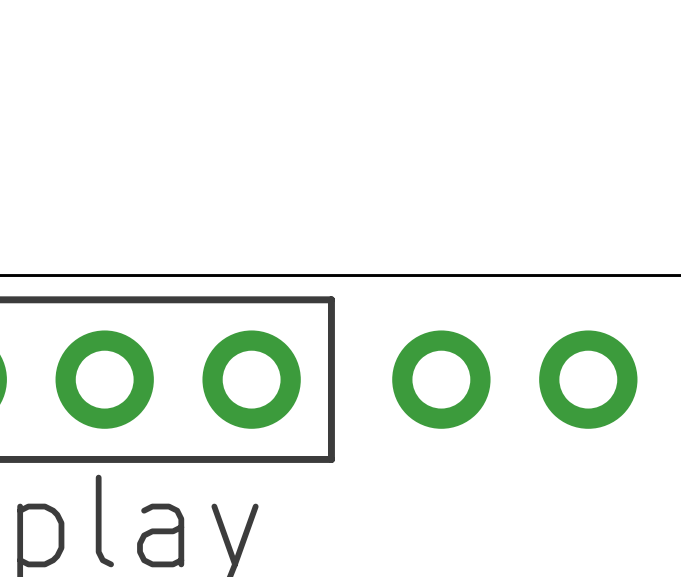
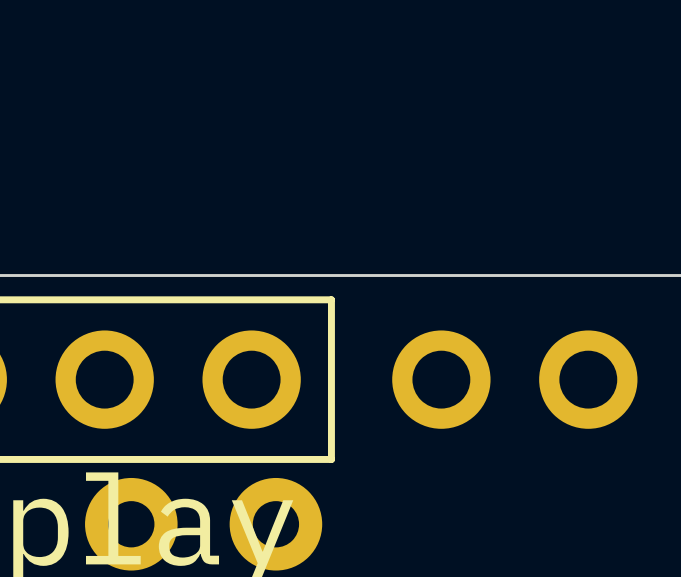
part: none -> (203, 524)

